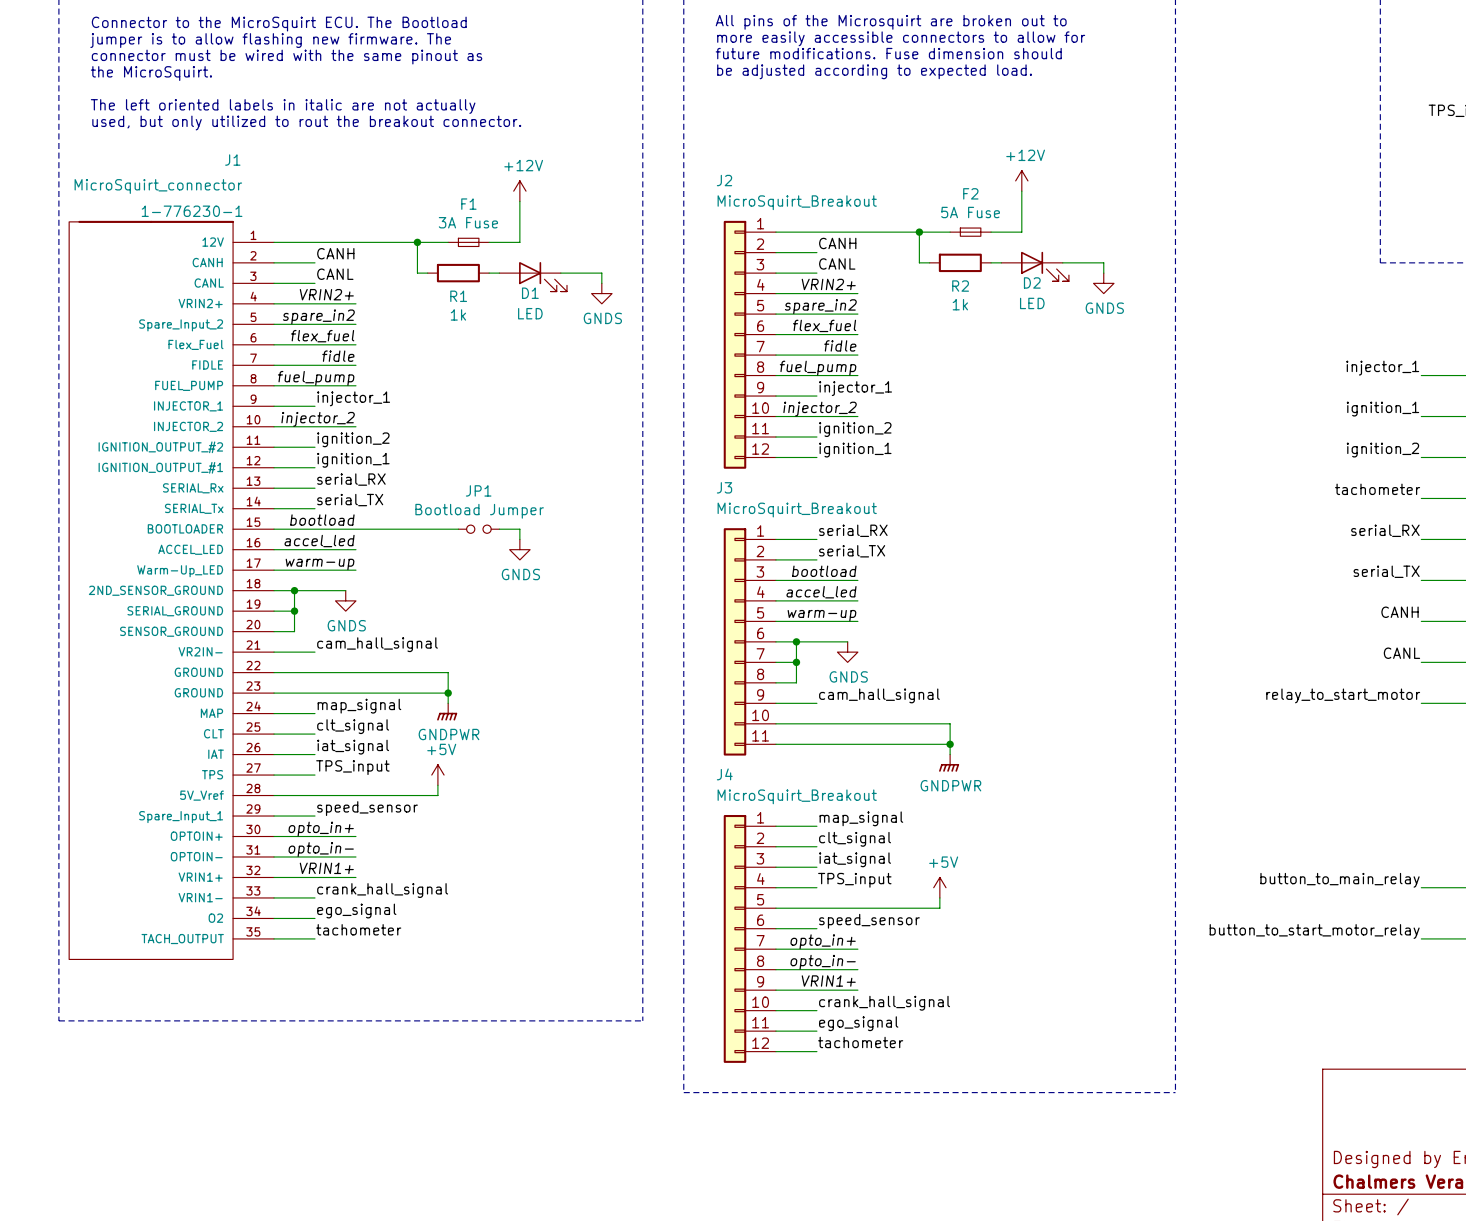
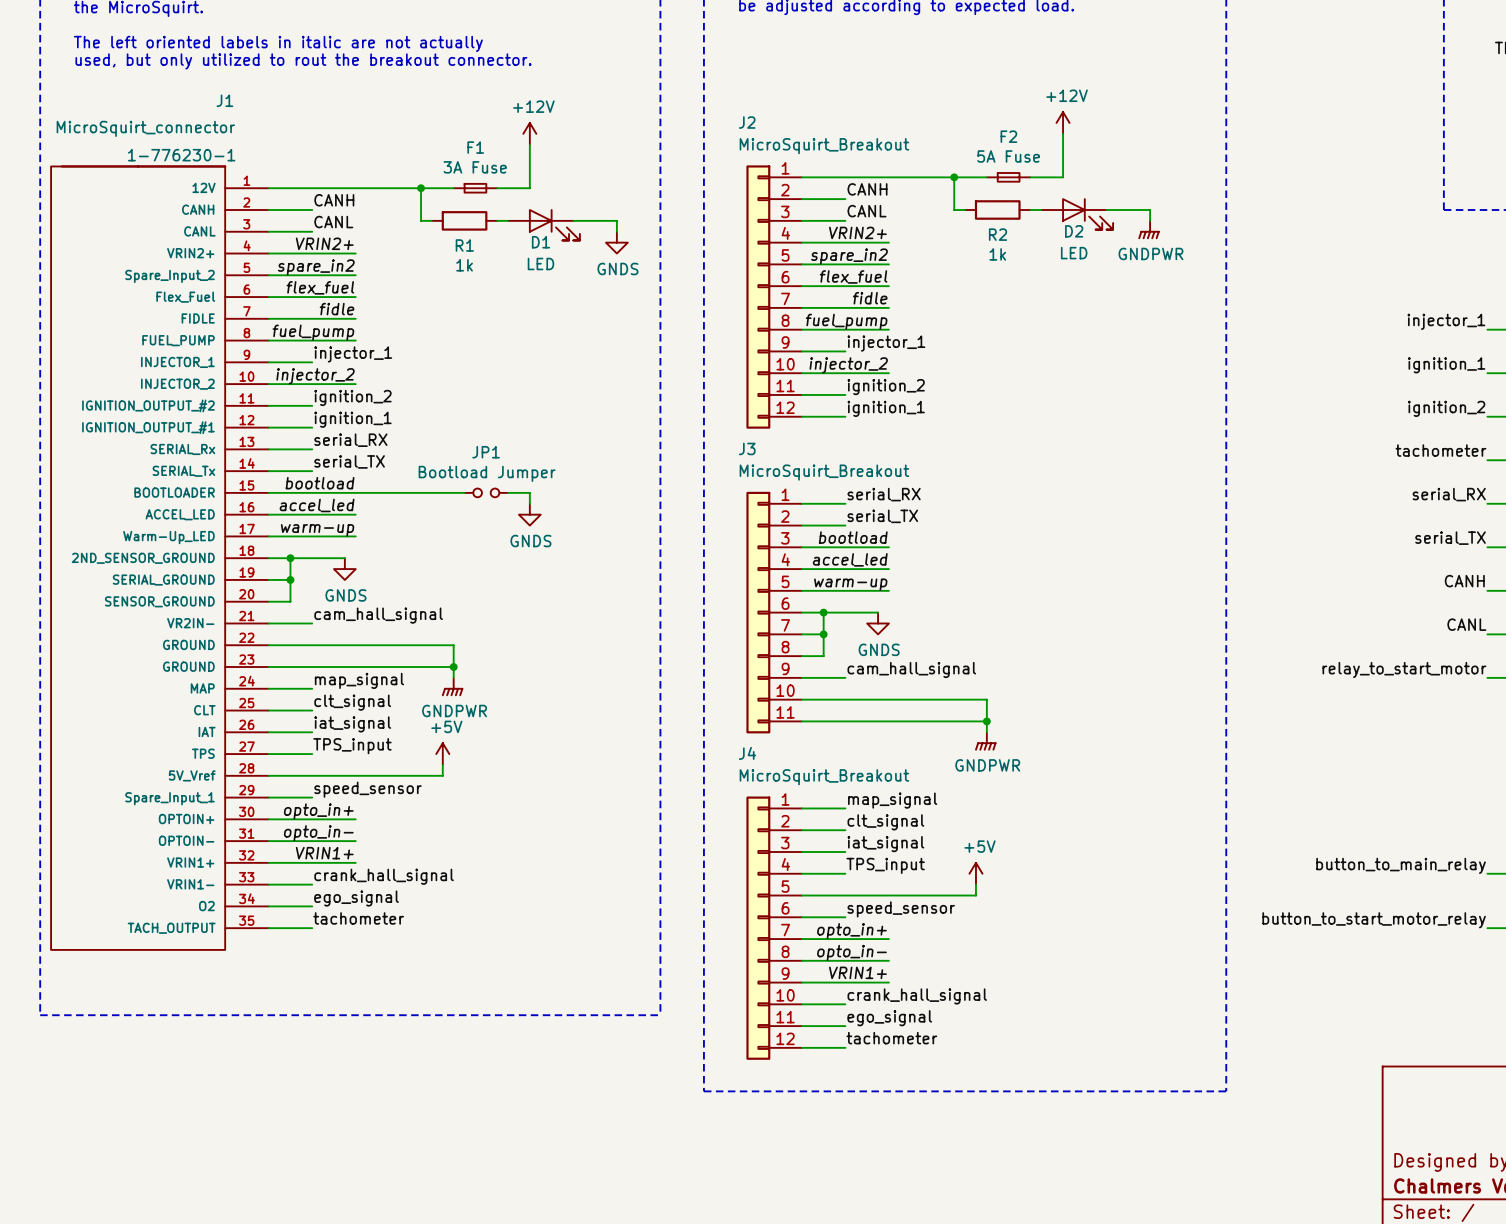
power symbol: GNDS (1103, 283) -> GNDPWR (1149, 230)

